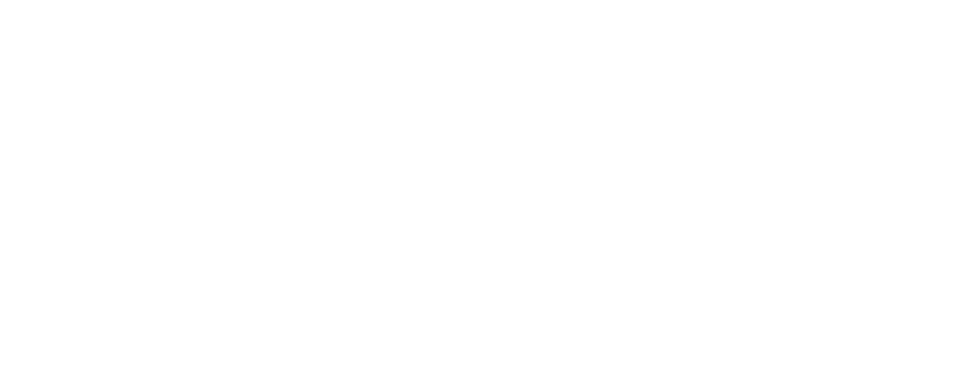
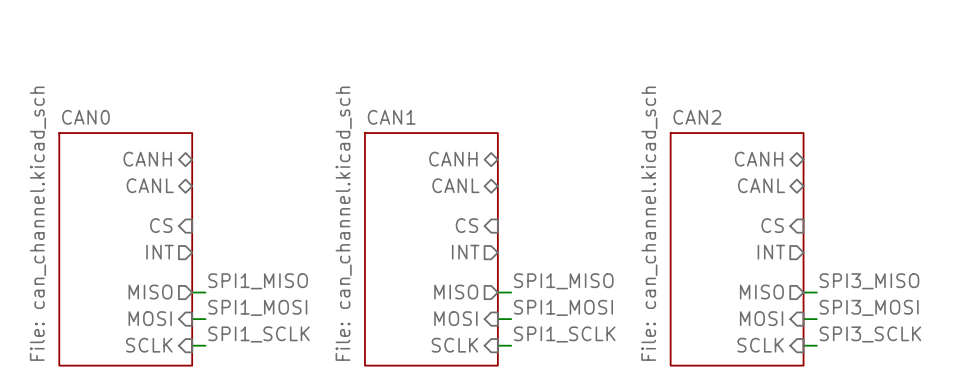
sheet pin: none -> CANH (147, 159)
sheet pin: none -> CANH (453, 159)
sheet pin: none -> CANH (759, 159)
sheet pin: none -> CANL (150, 185)
sheet pin: none -> CANL (455, 185)
sheet pin: none -> CANL (761, 185)
sheet pin: none -> CS (161, 225)
sheet pin: none -> CS (466, 225)
sheet pin: none -> CS (772, 225)
sheet CAN0: none -> File: can_channel.kicad_sch (125, 249)
sheet CAN1: none -> File: can_channel.kicad_sch (431, 249)
sheet CAN2: none -> File: can_channel.kicad_sch (737, 249)
sheet pin: none -> INT (160, 252)
sheet pin: none -> INT (465, 252)
sheet pin: none -> INT (771, 252)
label: none -> SPI1_MISO (258, 281)
label: none -> SPI1_MISO (563, 281)
label: none -> SPI3_MISO (869, 281)
sheet pin: none -> MISO (150, 292)
wire: none -> (192, 292) (205, 292)
sheet pin: none -> MISO (456, 292)
wire: none -> (497, 292) (511, 292)
sheet pin: none -> MISO (761, 292)
wire: none -> (803, 292) (816, 292)
label: none -> SPI1_MOSI (257, 307)
label: none -> SPI1_MOSI (563, 307)
label: none -> SPI3_MOSI (869, 307)
sheet pin: none -> MOSI (150, 318)
sheet pin: none -> MOSI (455, 318)
sheet pin: none -> MOSI (761, 318)
wire: none -> (192, 319) (205, 319)
wire: none -> (497, 319) (511, 319)
wire: none -> (803, 319) (816, 319)
label: none -> SPI1_SCLK (259, 334)
label: none -> SPI1_SCLK (564, 334)
label: none -> SPI3_SCLK (870, 334)
sheet pin: none -> SCLK (149, 345)
wire: none -> (192, 345) (205, 345)
sheet pin: none -> SCLK (454, 345)
wire: none -> (497, 345) (511, 345)
sheet pin: none -> SCLK (760, 345)
wire: none -> (803, 345) (816, 345)

